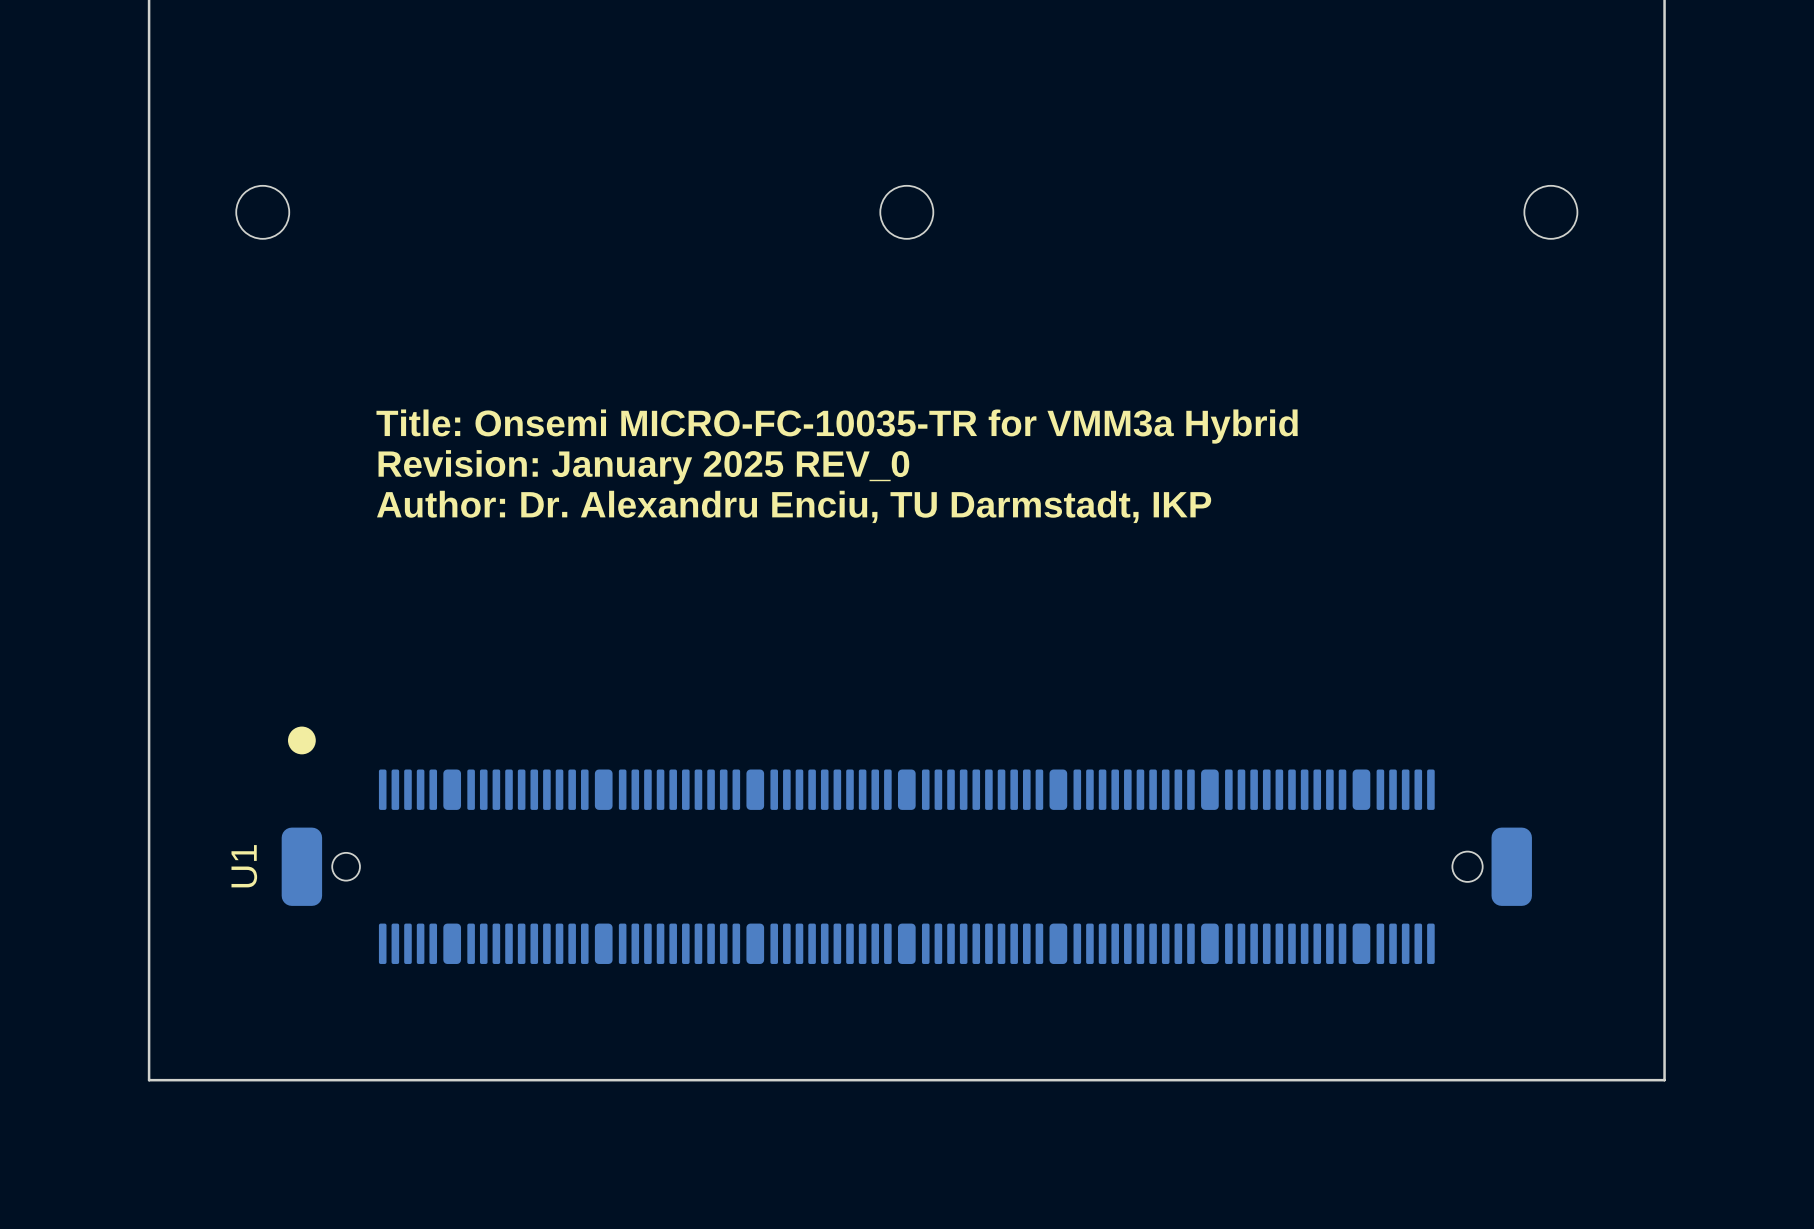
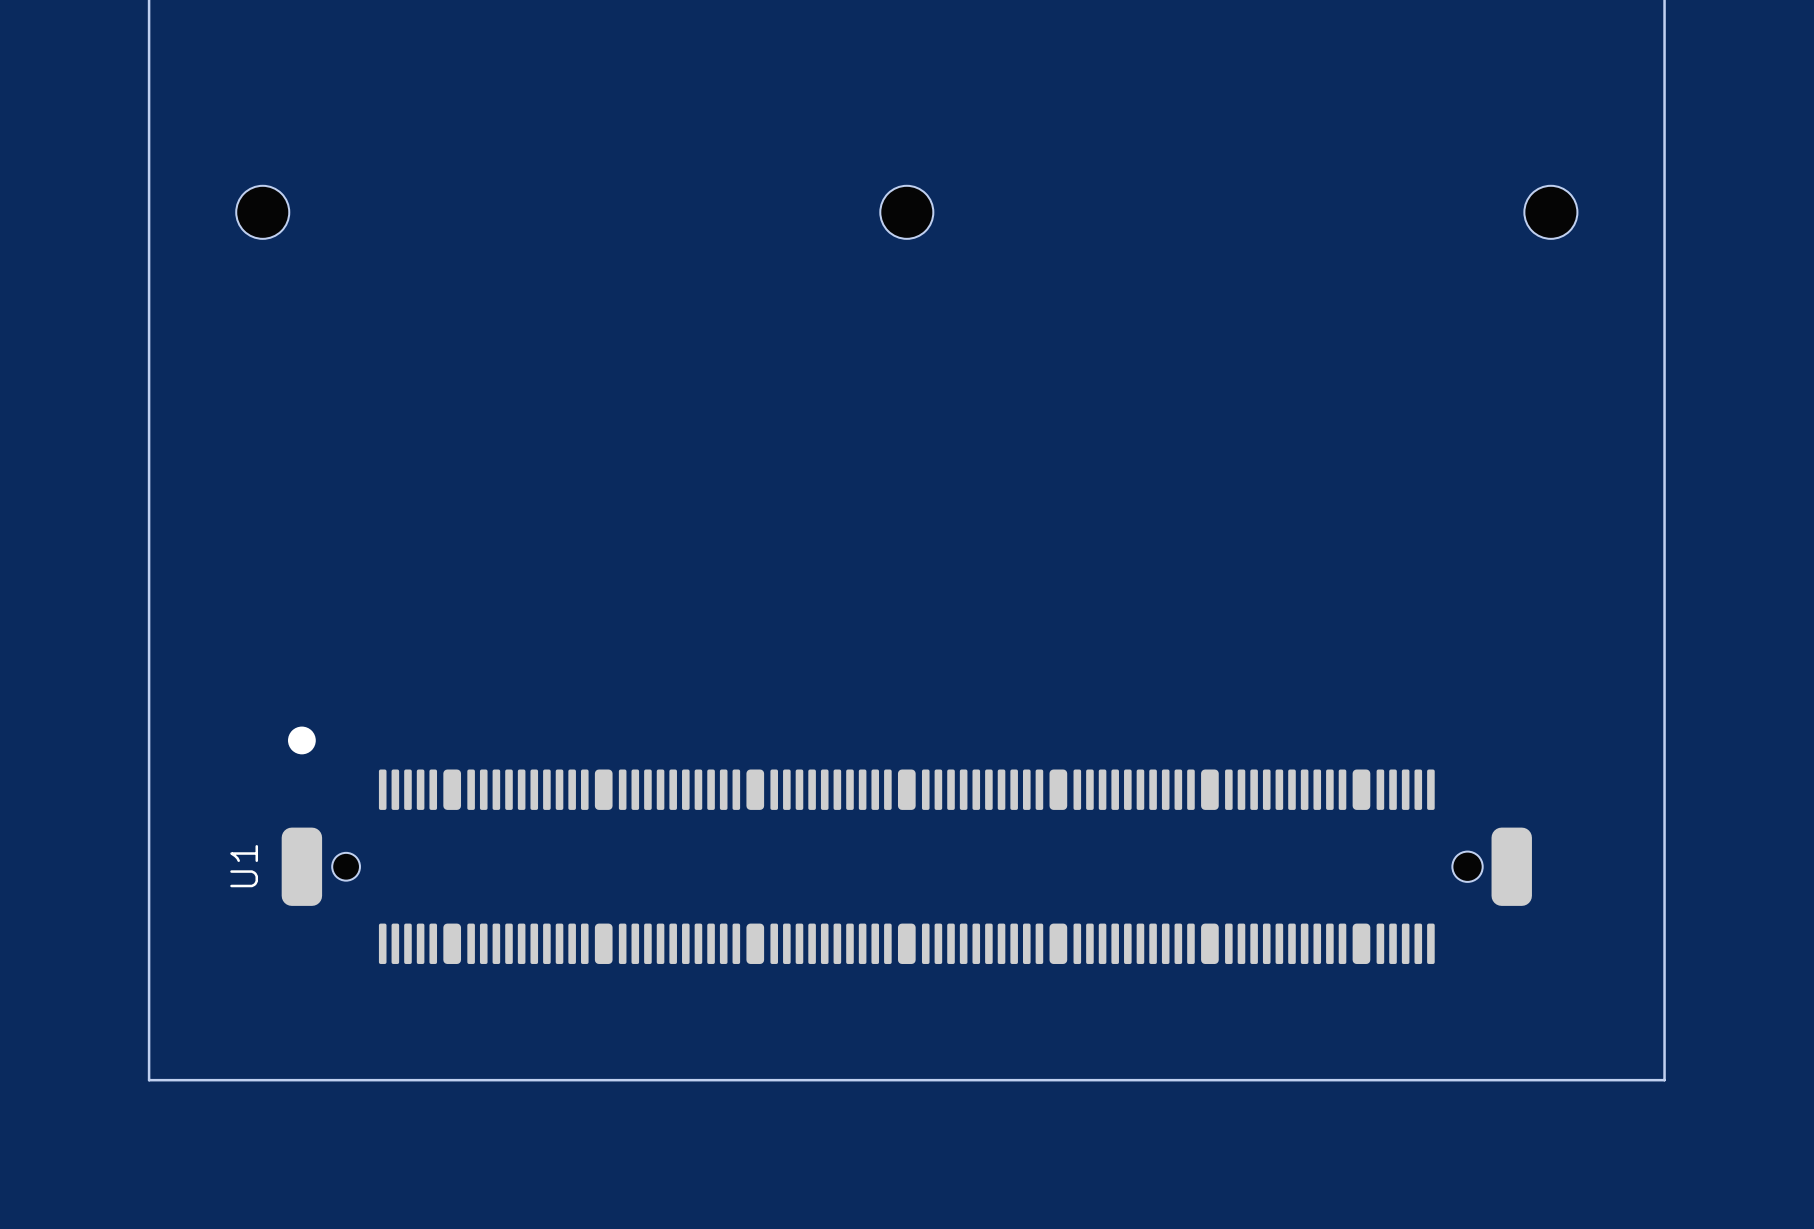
text: Title: Onsemi MICRO-FC-10035-TR for VMM3a Hybrid (837, 426) -> none
text: Revision: January 2025 REV_0 (643, 467) -> none
text: Author: Dr. Alexandru Enciu, TU Darmstadt, IKP (794, 506) -> none

